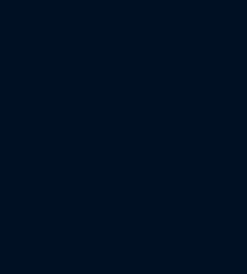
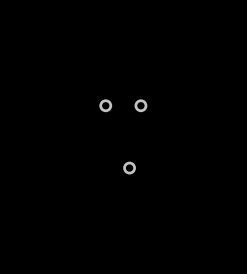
via: none -> (105, 105)
via: none -> (140, 105)
via: none -> (129, 168)

